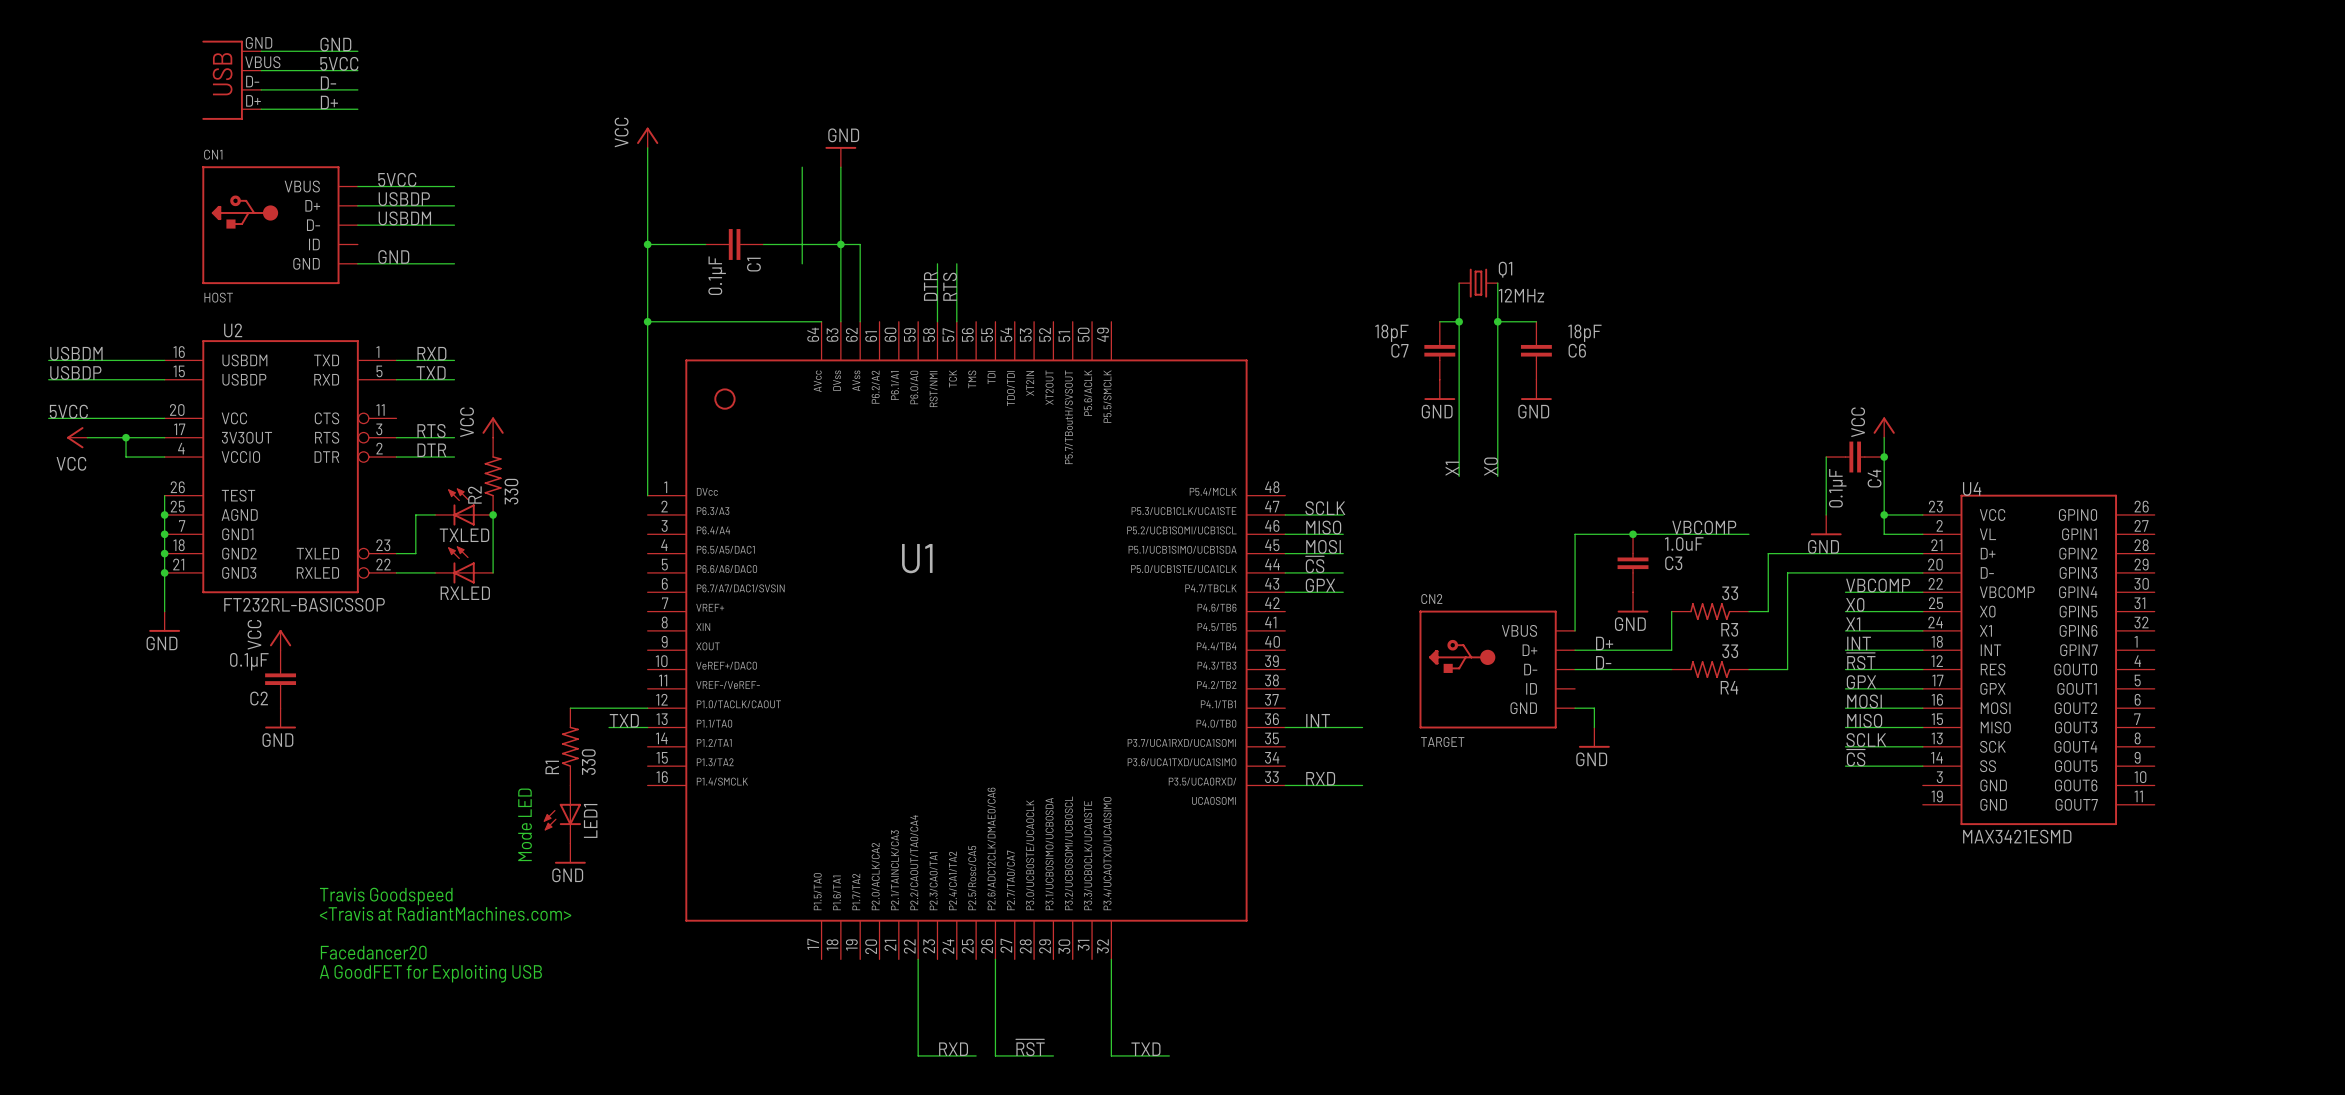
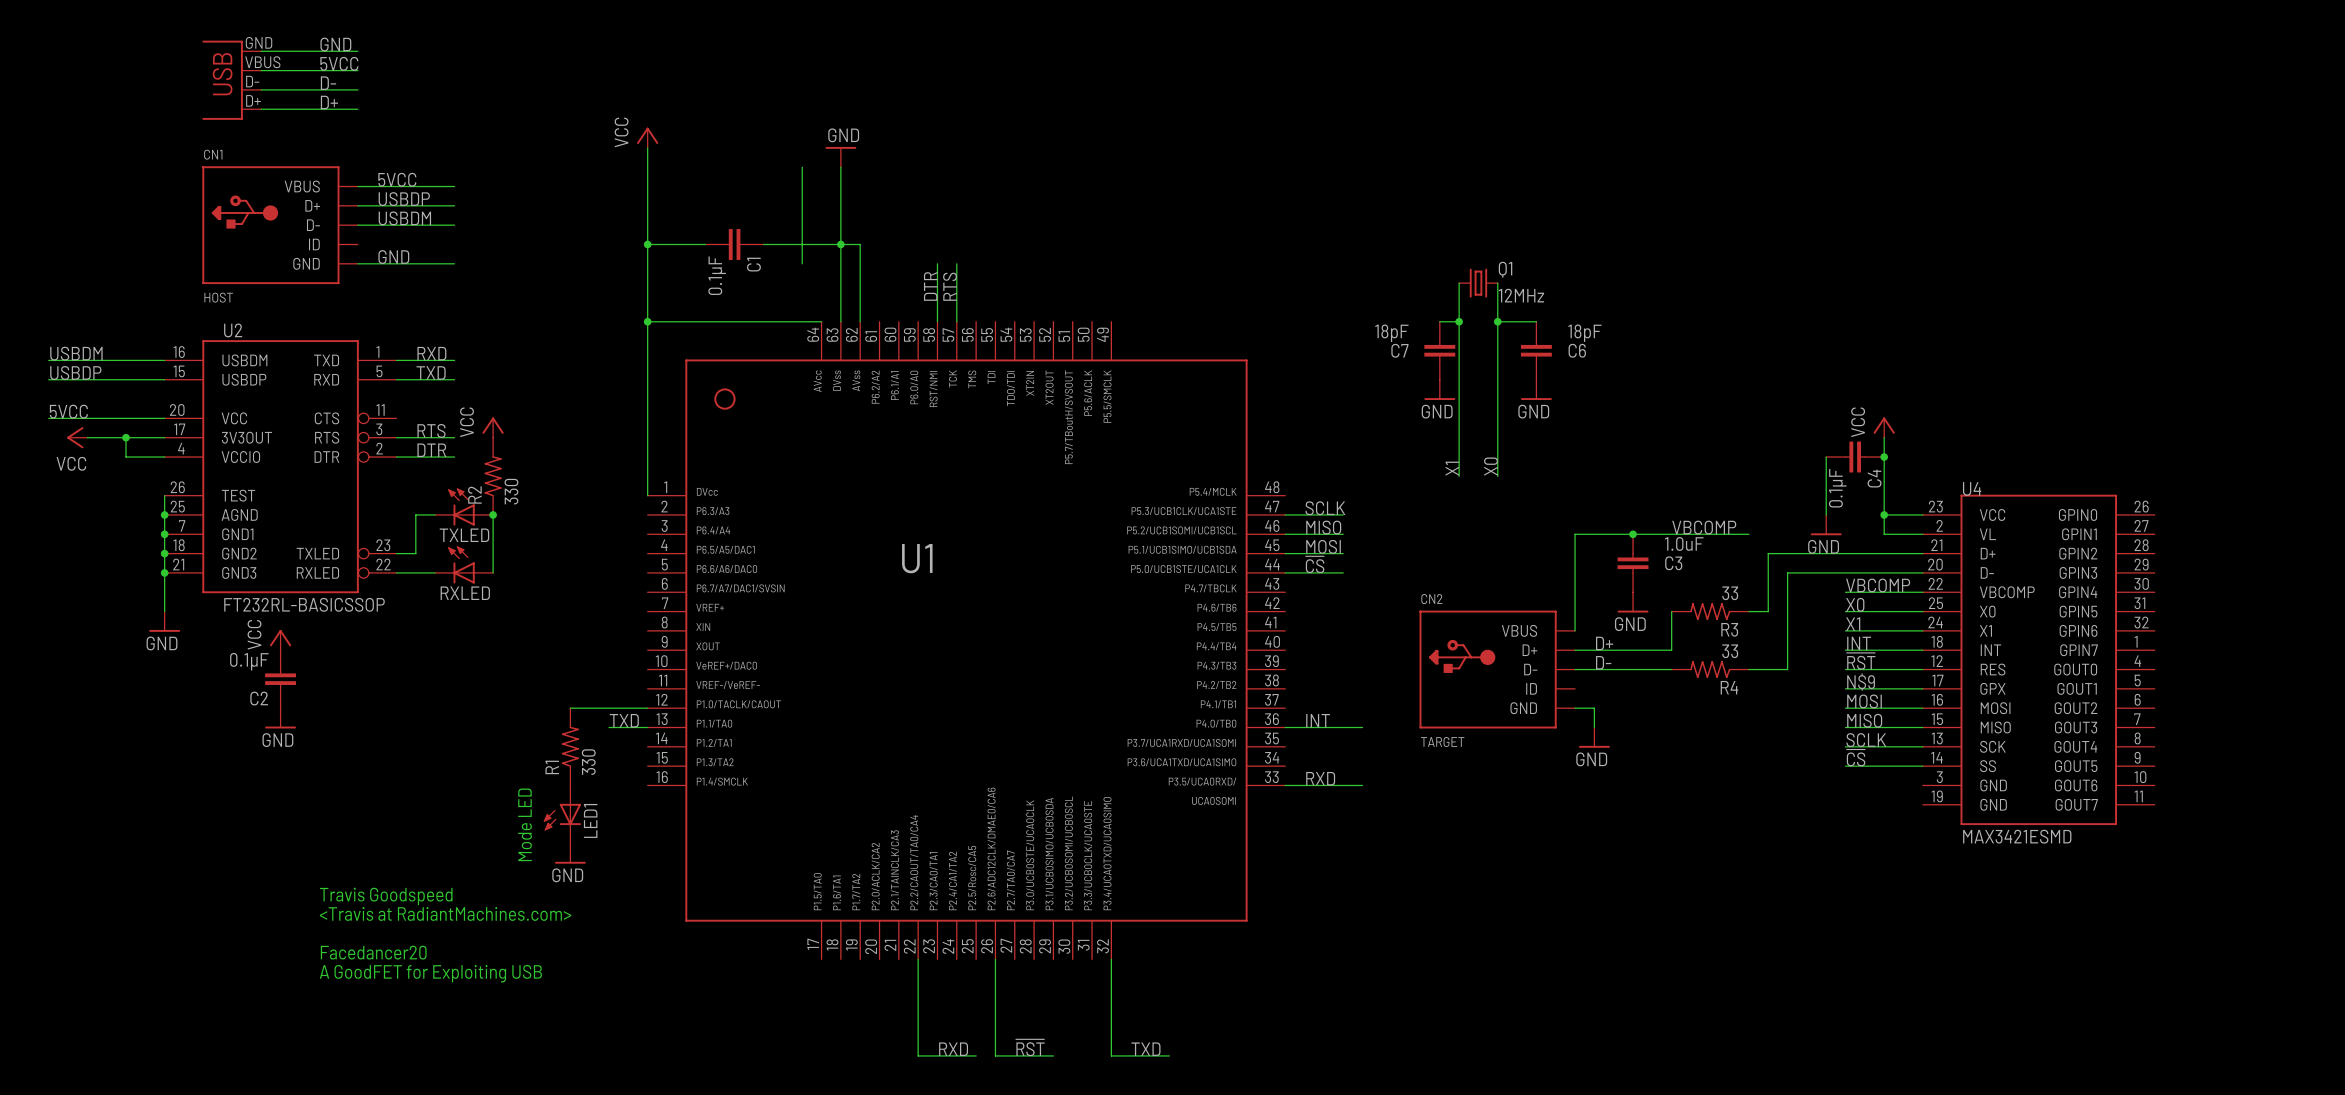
label: GPX (1320, 585) -> none
wire: (1285, 592) (1343, 592) -> none
label: GPX (1861, 682) -> N$9 (1861, 682)

